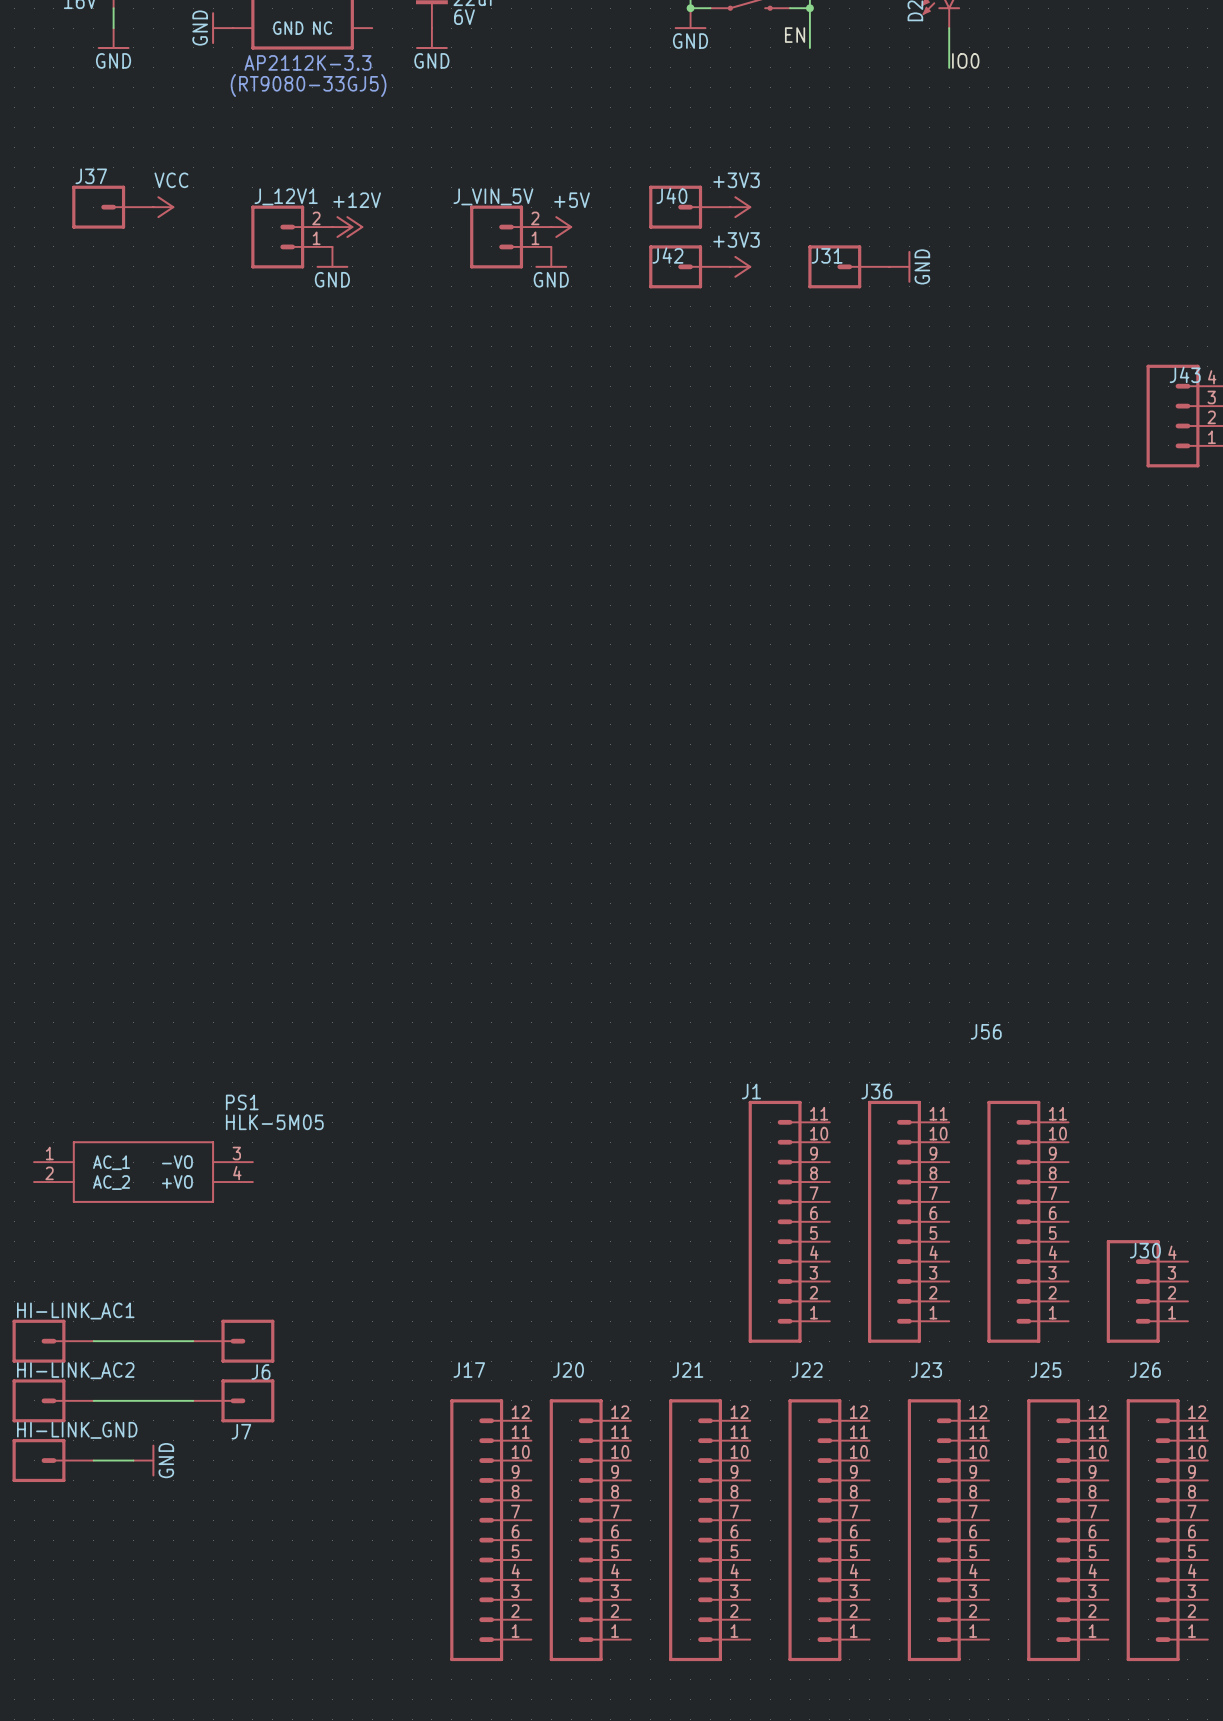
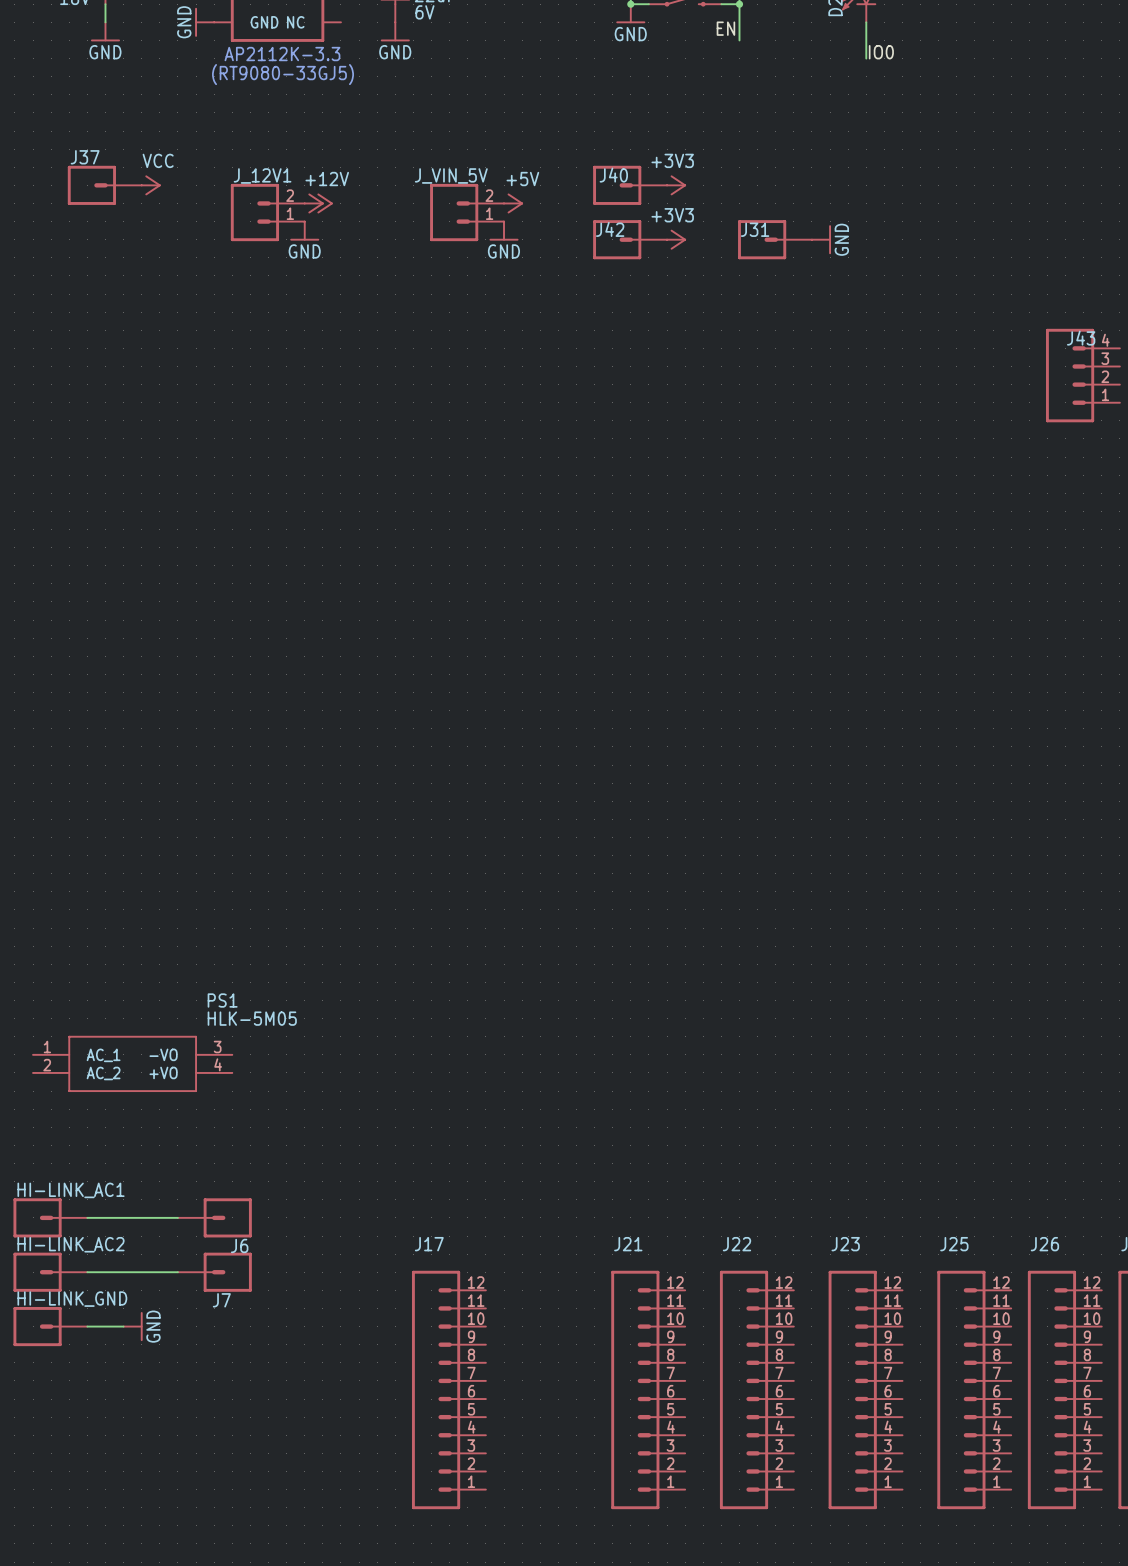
J1: (789, 1221) -> none
J36: (908, 1221) -> none
J56: (1027, 1221) -> none
J30: (1147, 1291) -> none
J20: (590, 1530) -> none

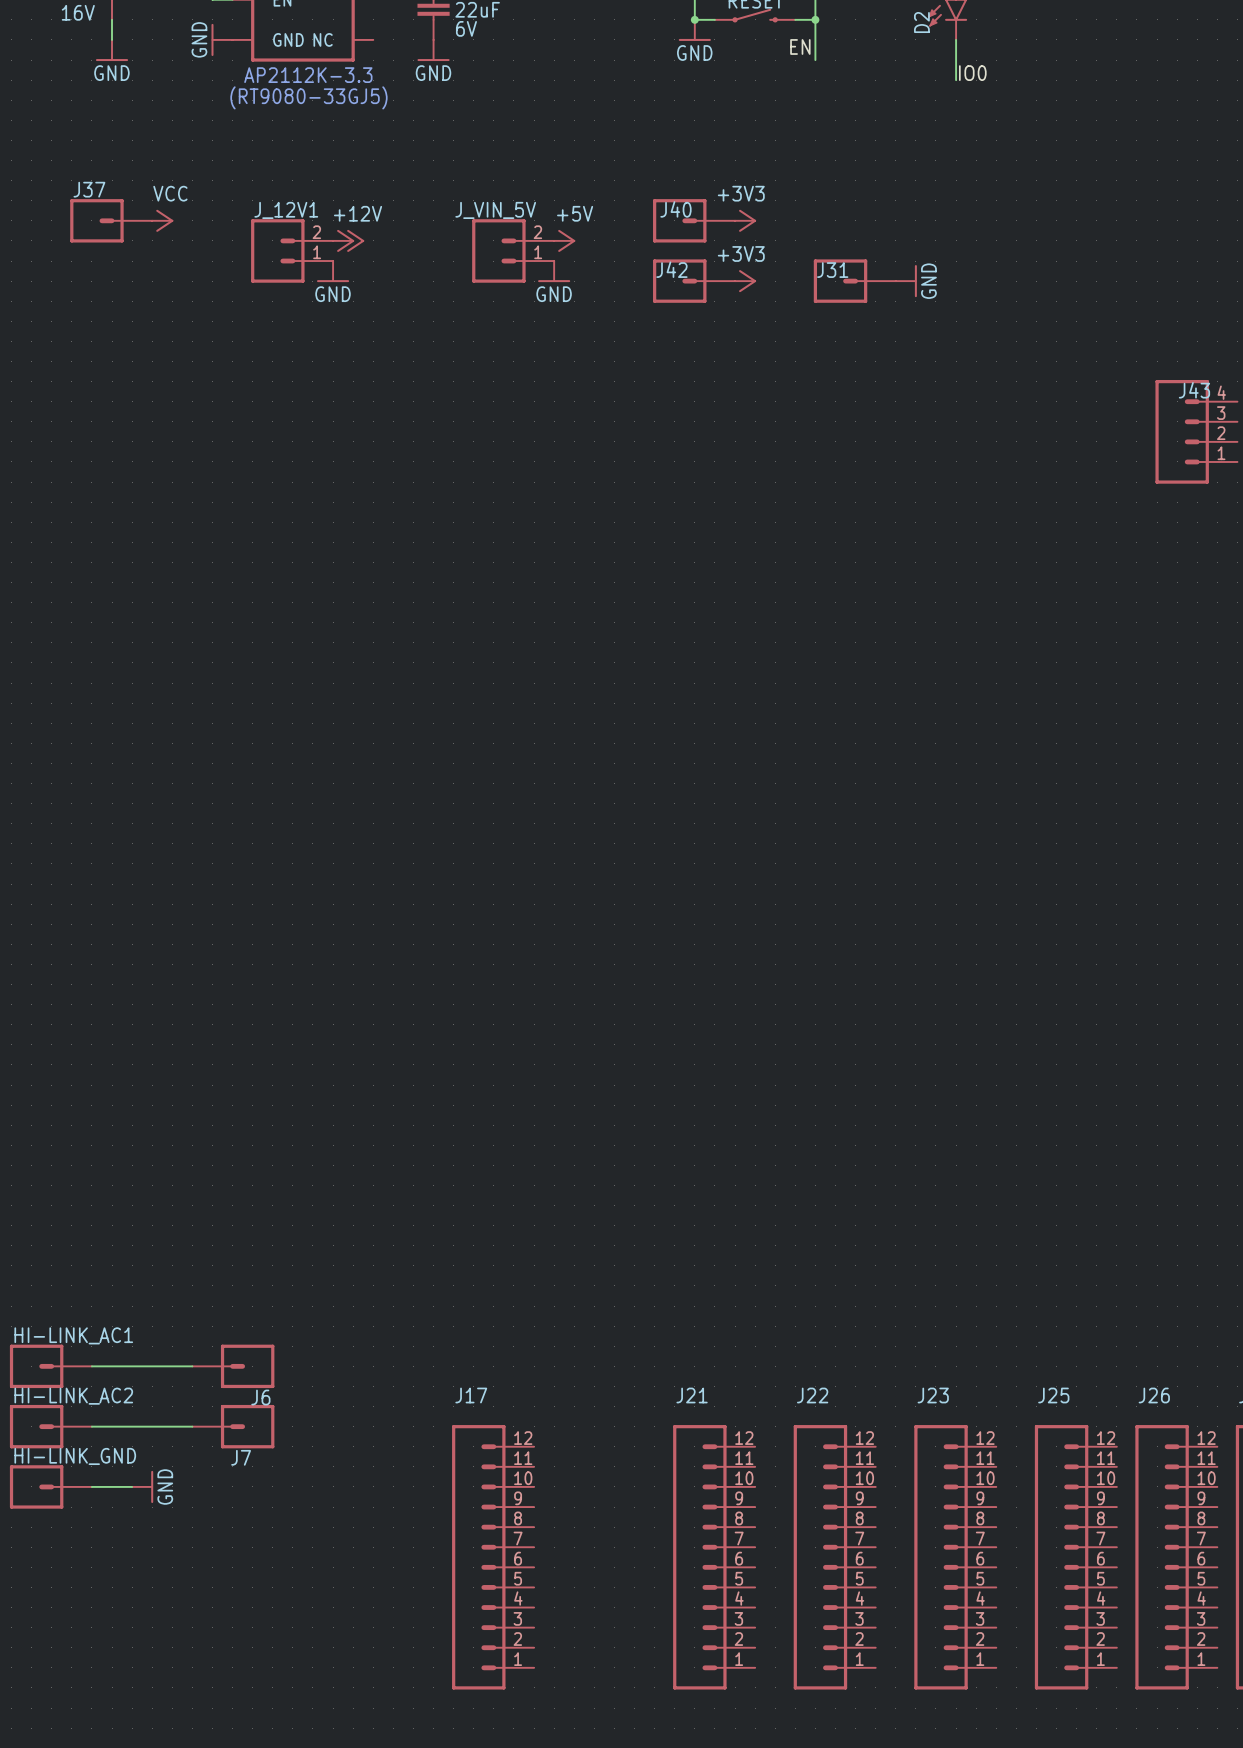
PS1: HLK-5M05 (132, 1063) -> none

